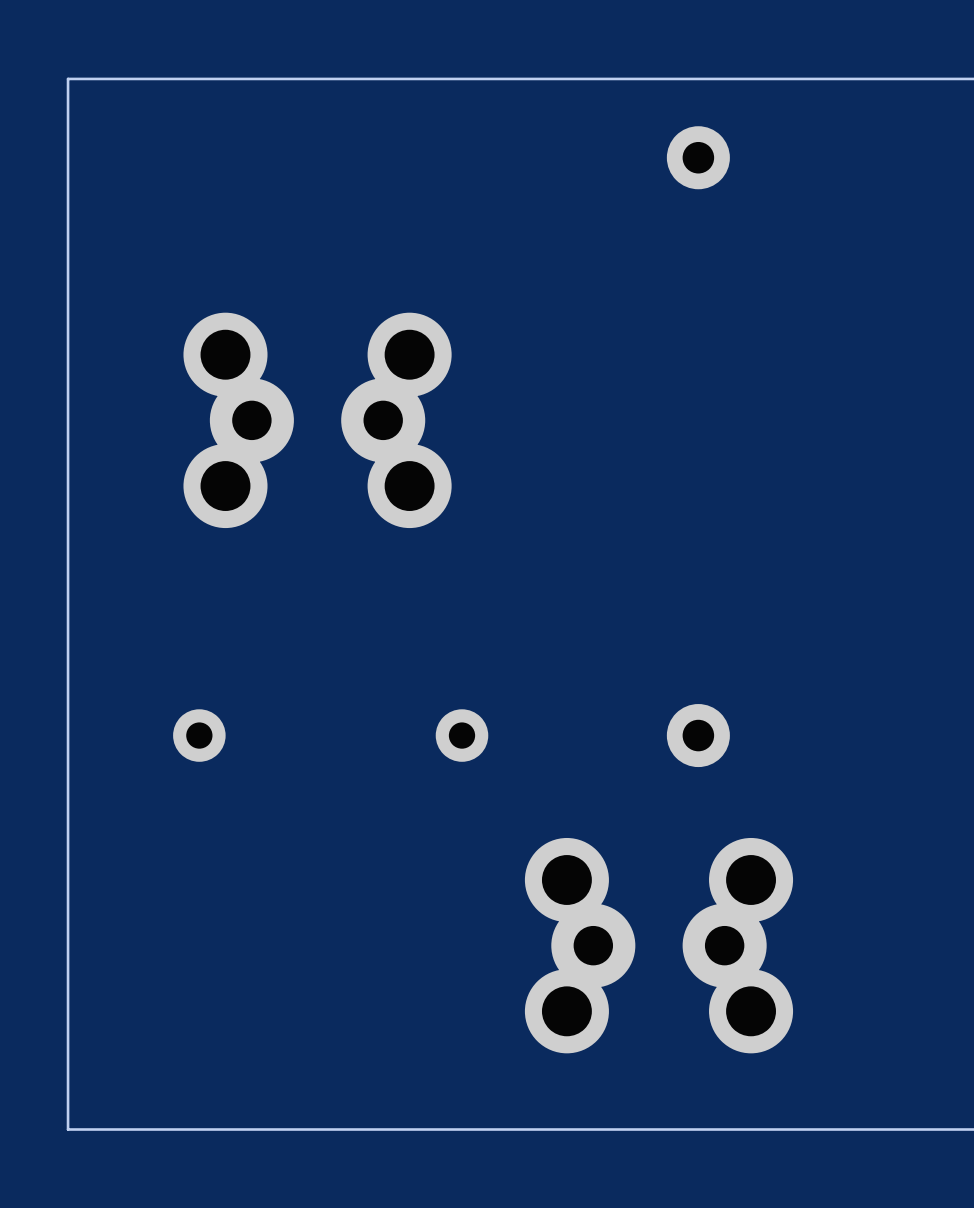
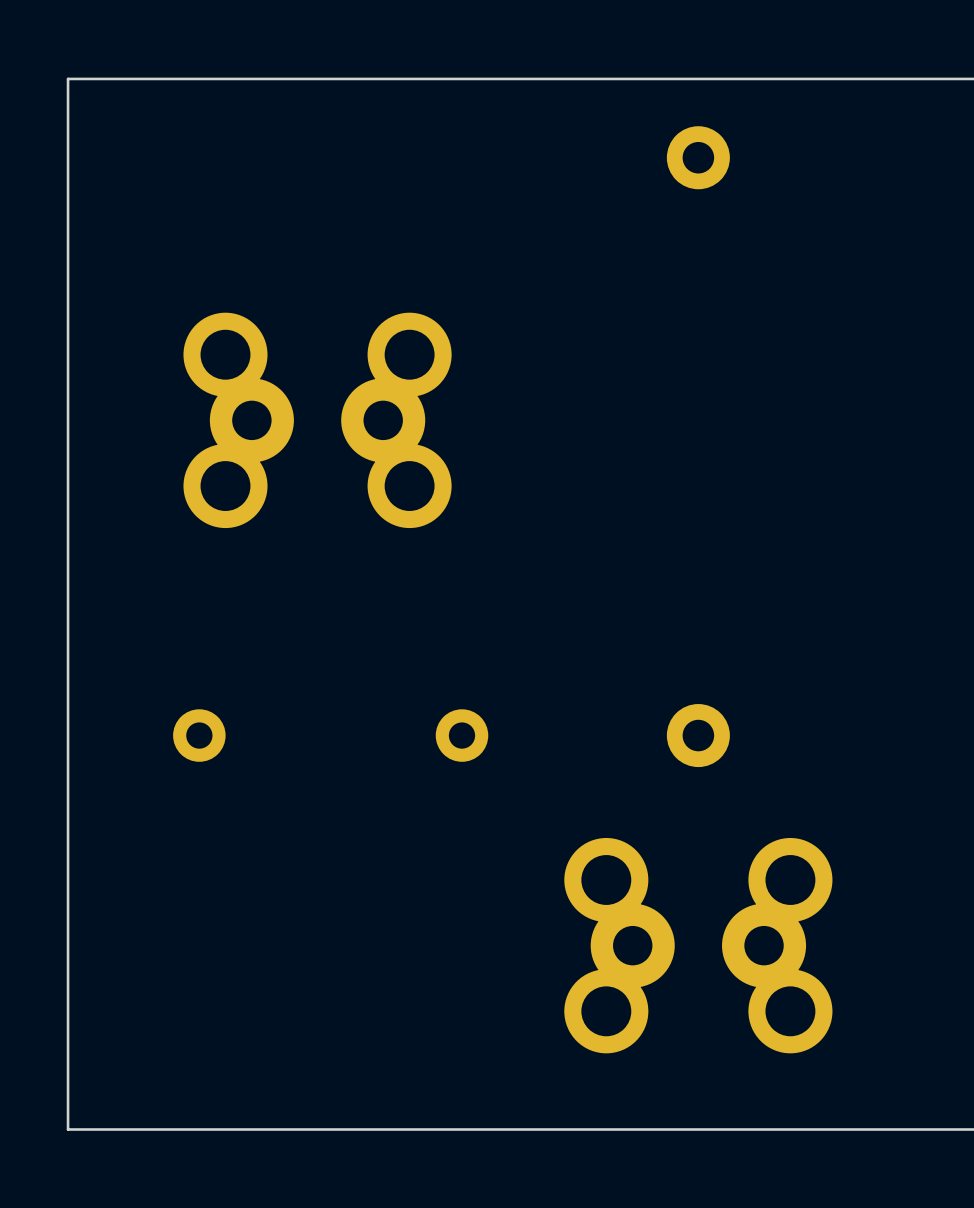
part position: (658, 945) -> (698, 945)

